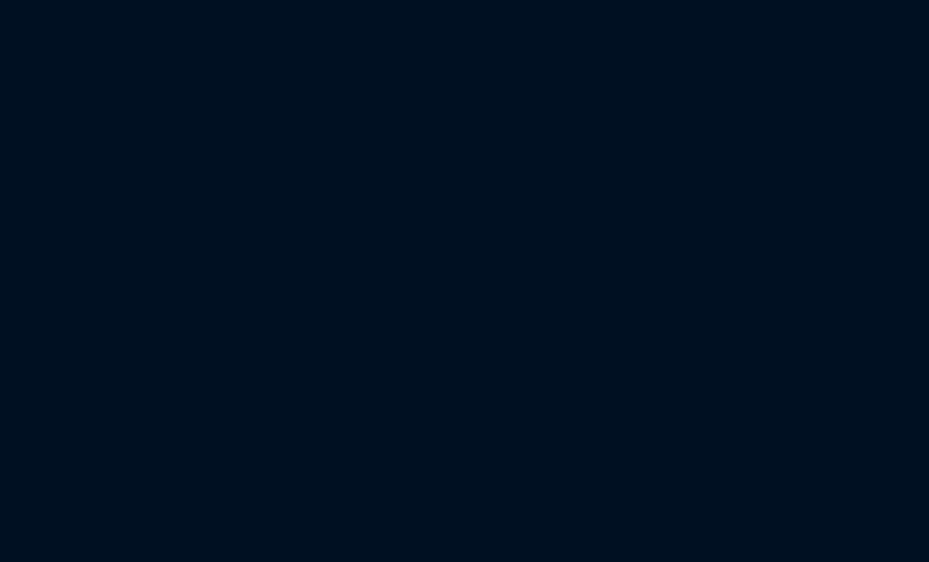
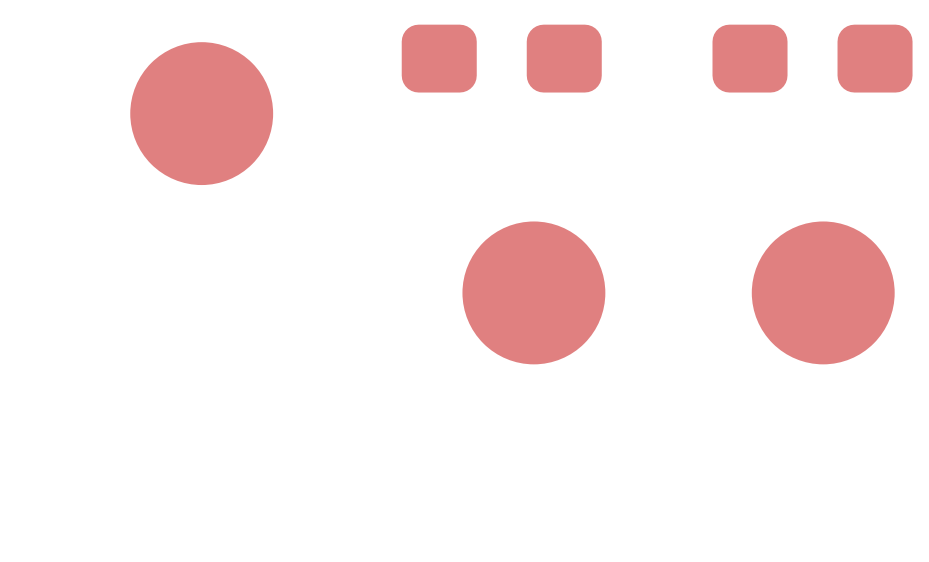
part: none -> (501, 58)
part: none -> (812, 58)
part: none -> (201, 113)
part: none -> (533, 292)
part: none -> (823, 292)

